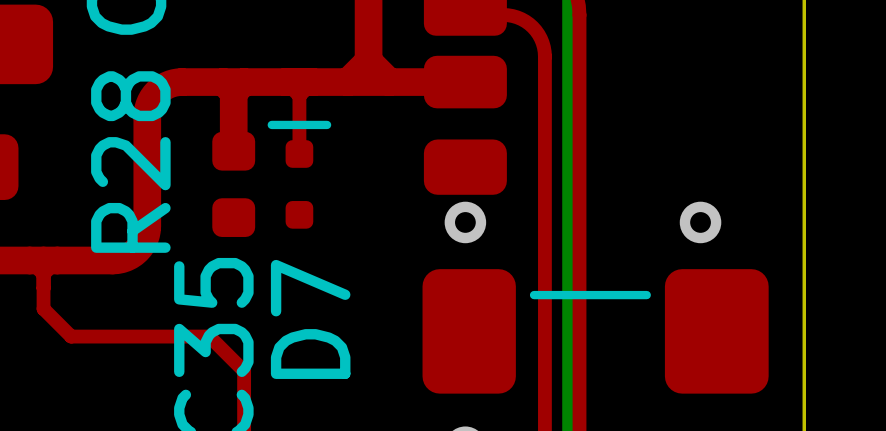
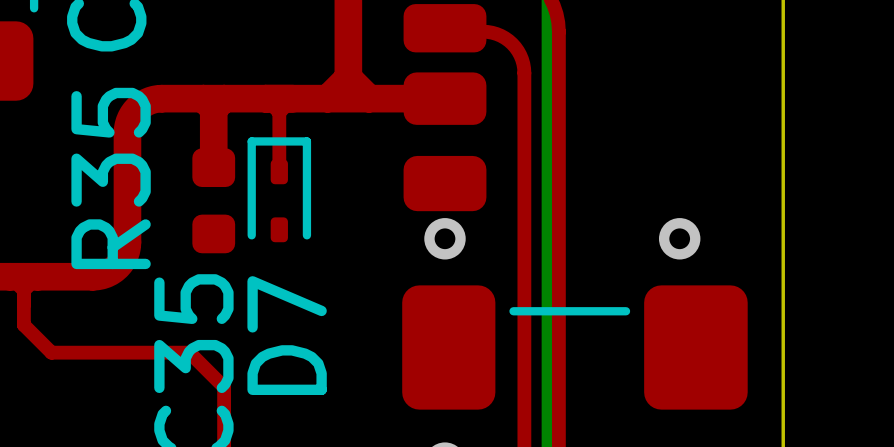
D7 footprint: [267, 120, 332, 229] -> [247, 137, 312, 243]
R28 name: R28 (130, 162) -> R35 (111, 178)

